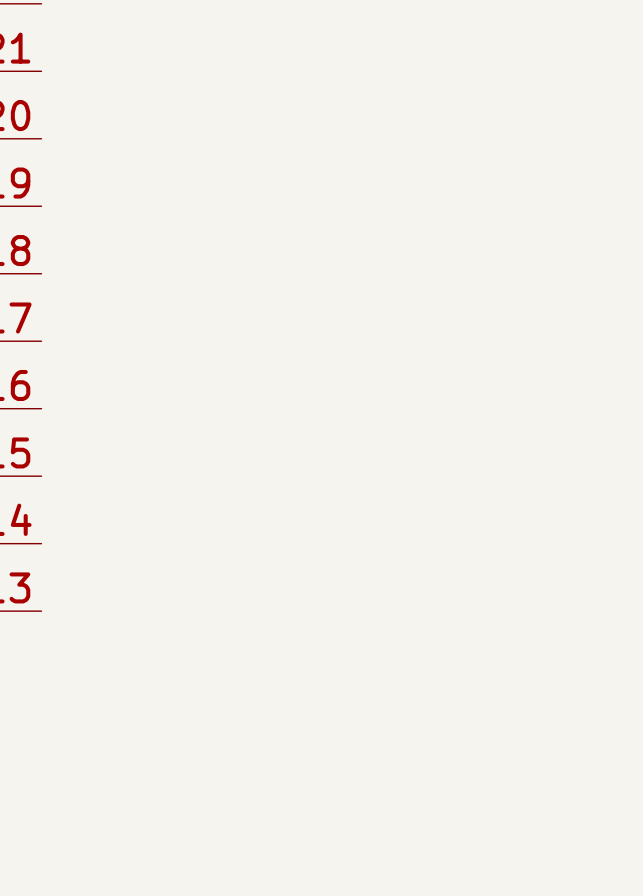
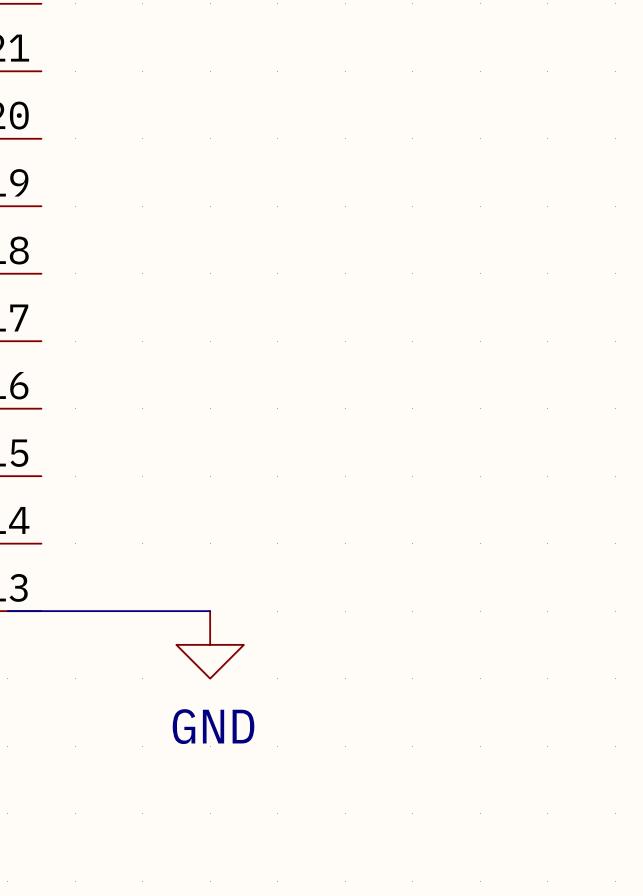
wire: none -> (7, 611) (210, 611)
power symbol: none -> GND (210, 644)

